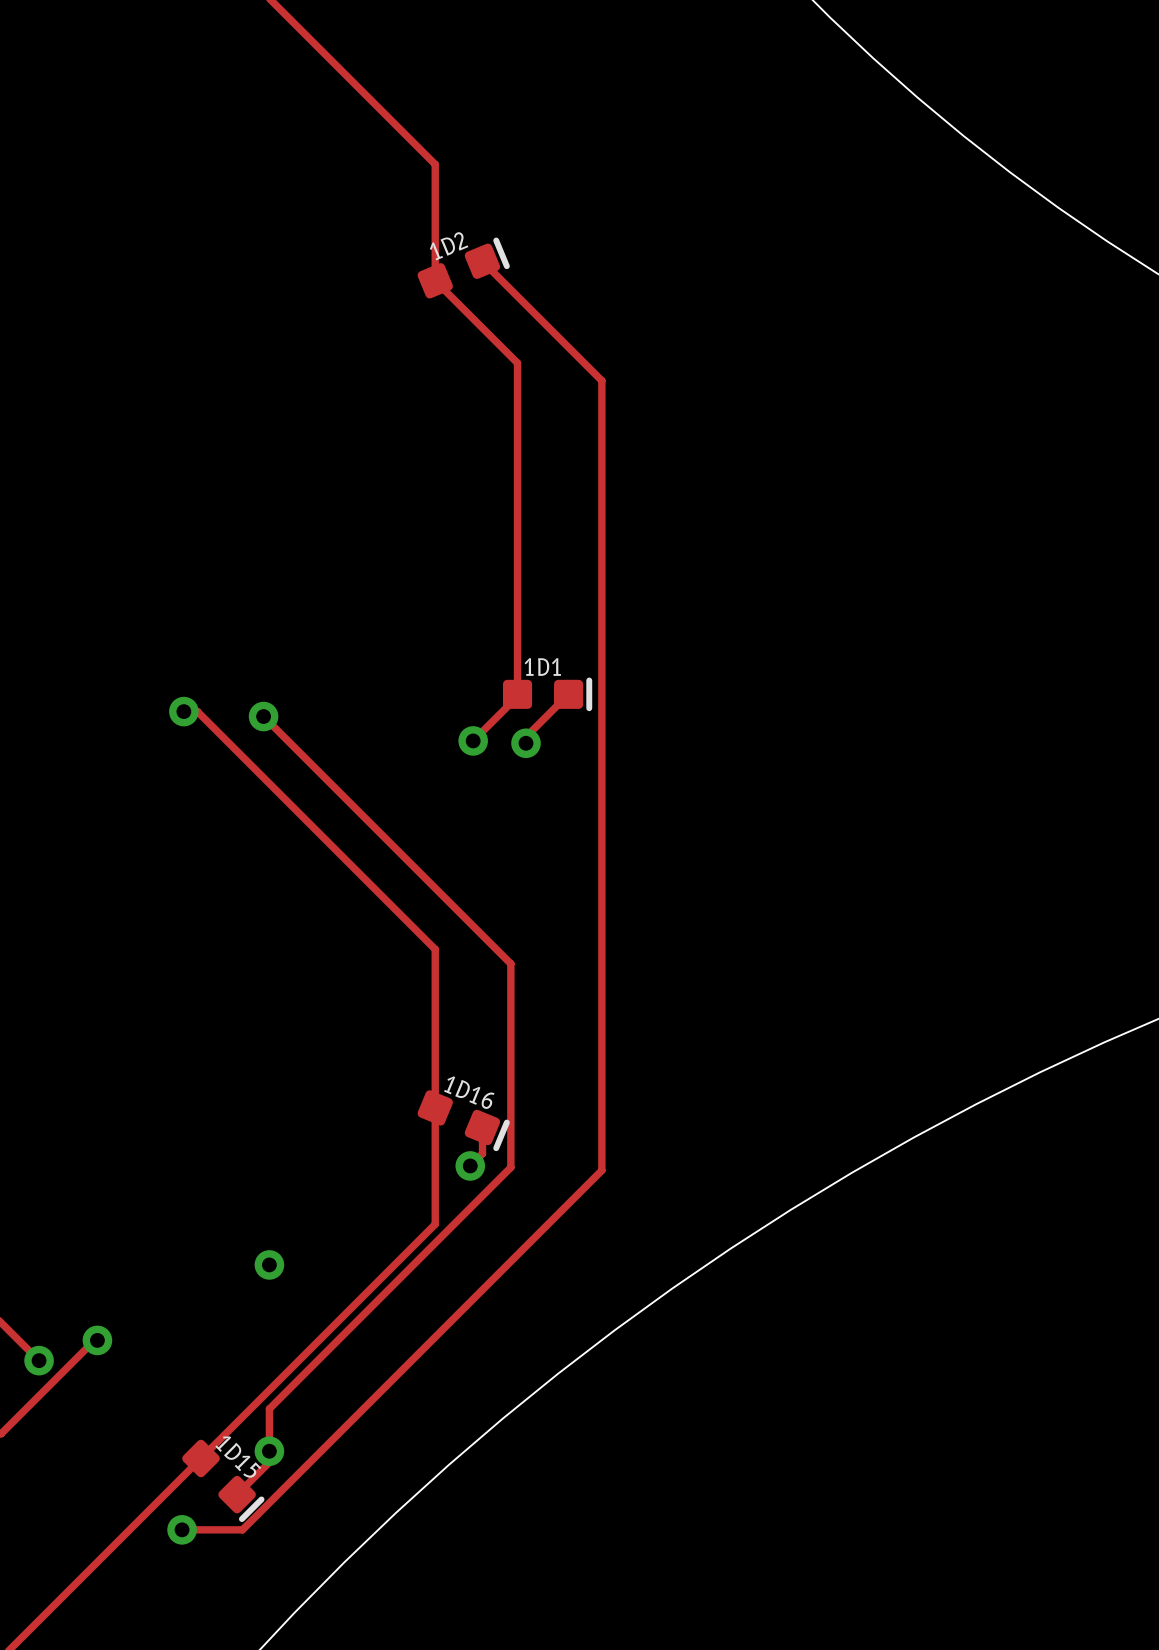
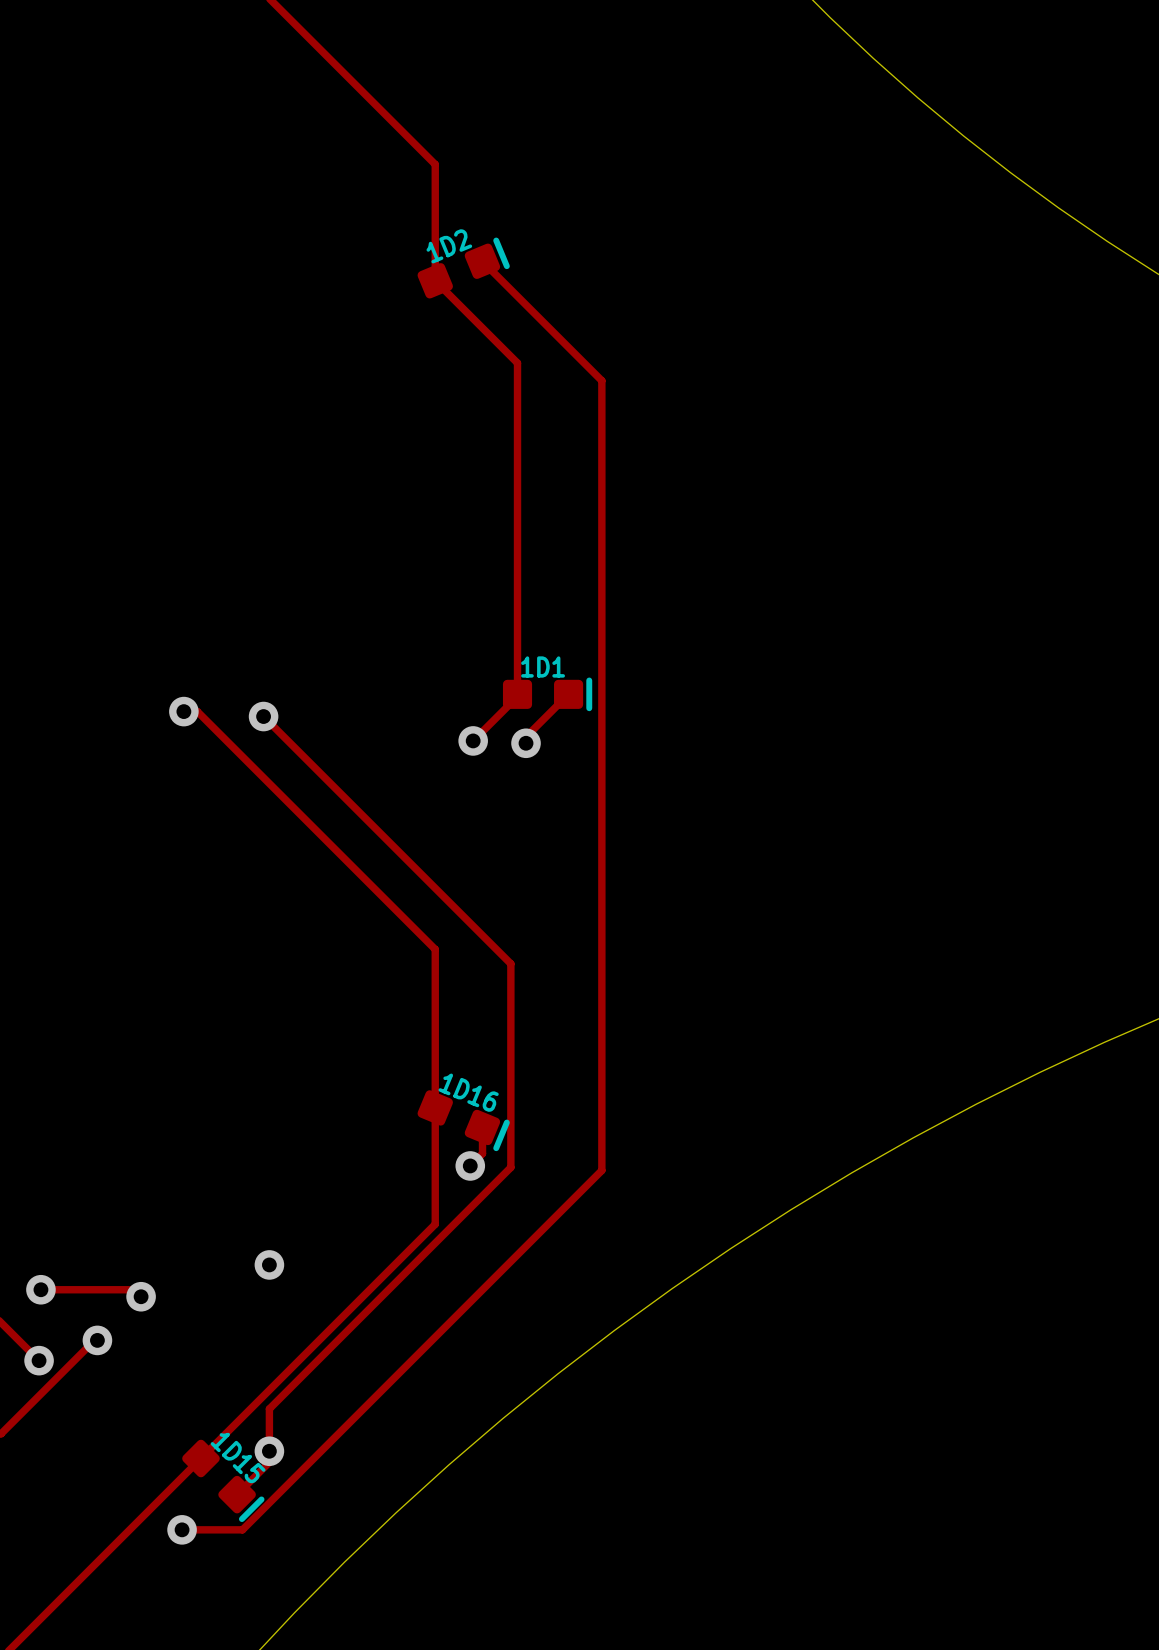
track: none -> (40, 1289) (134, 1289) (141, 1296)
via: none -> (40, 1289)
via: none -> (141, 1296)

